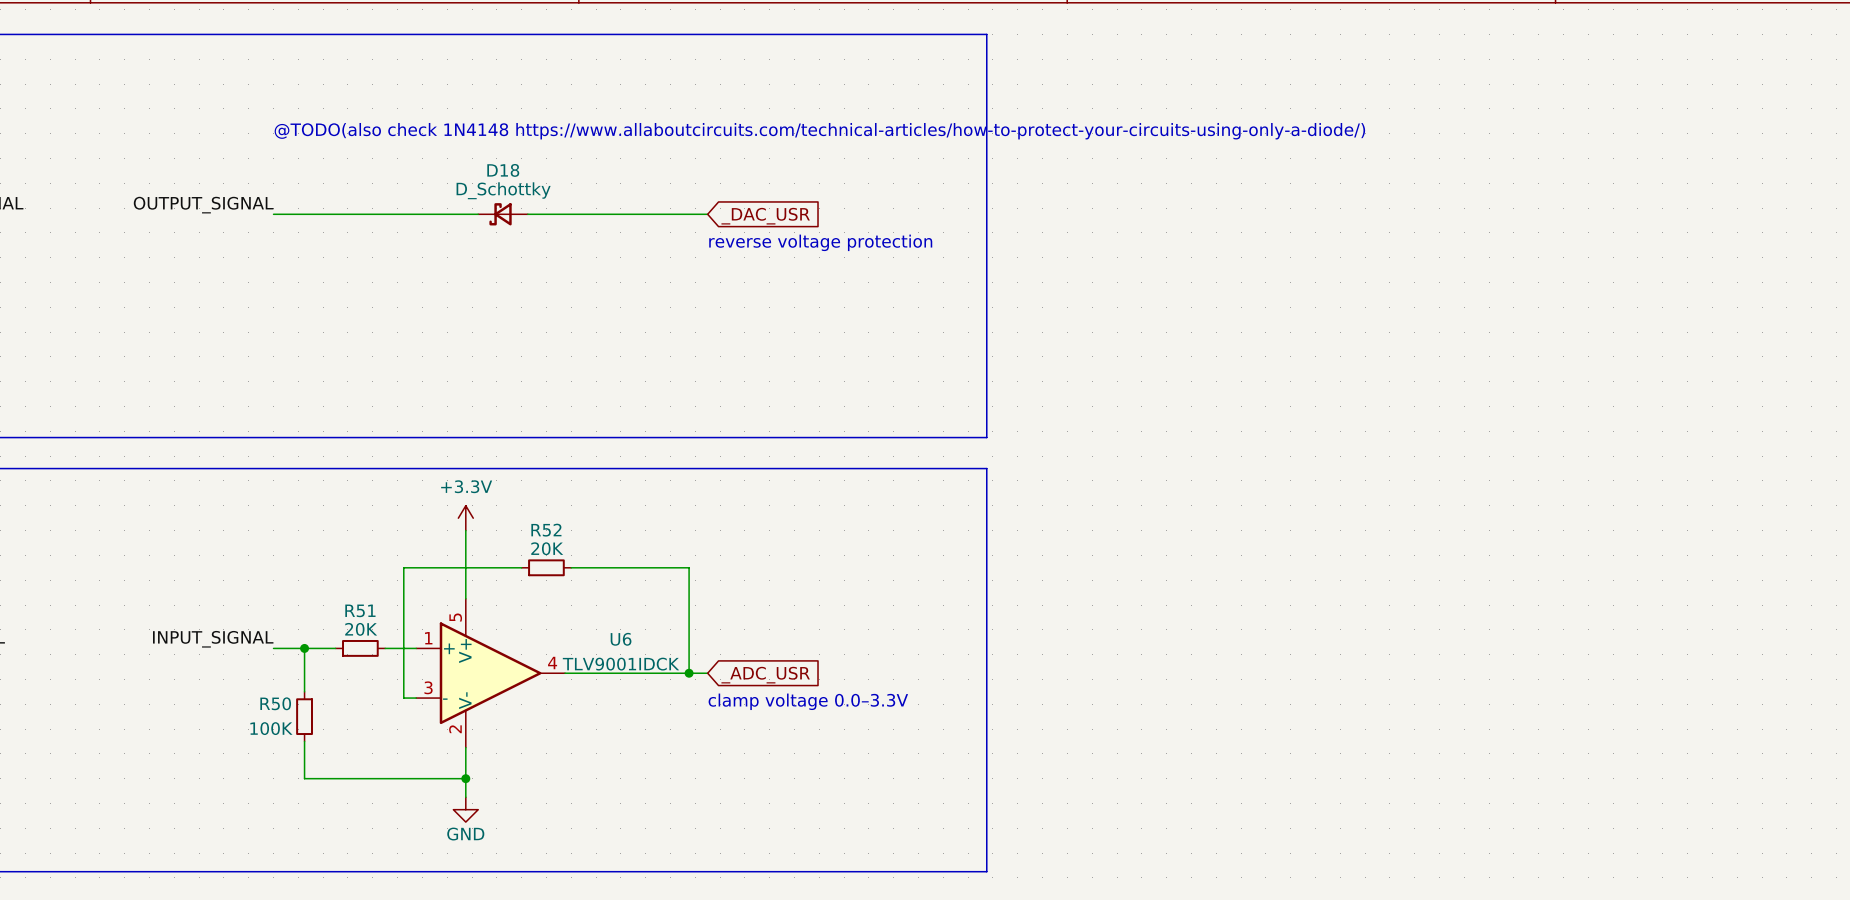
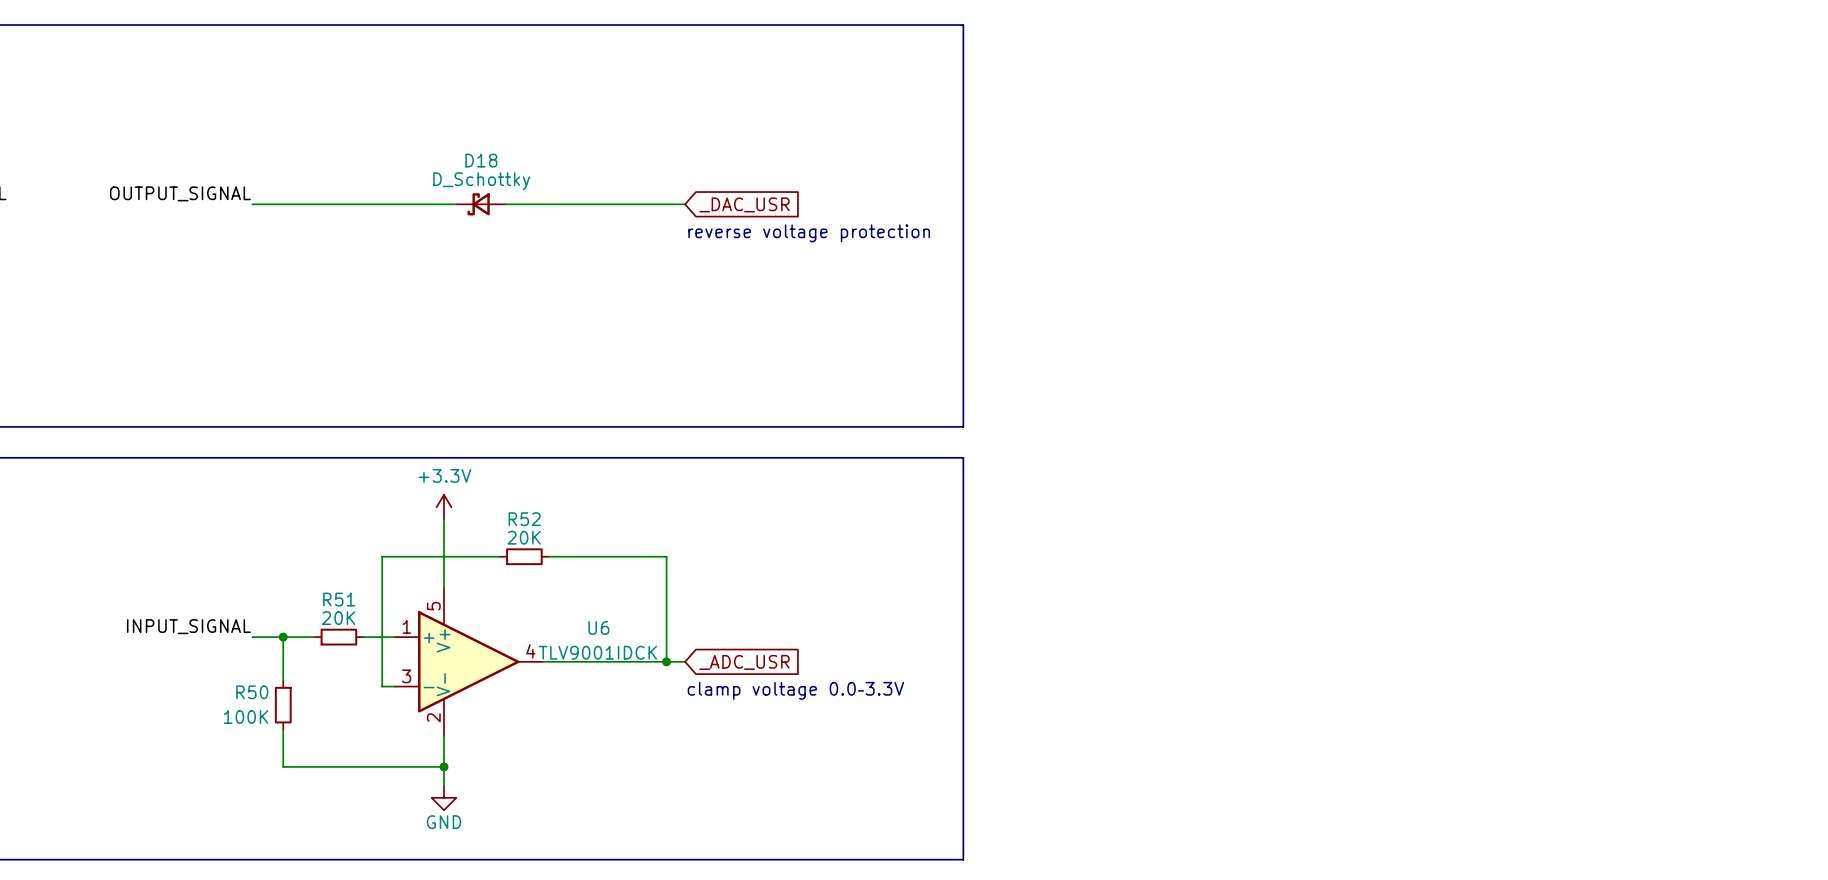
text: @TODO(also check 1N4148 https://www.allaboutcircuits.com/technical-articles/how-to-protect-your-circuits-using-only-a-diode/) (819, 131) -> none

